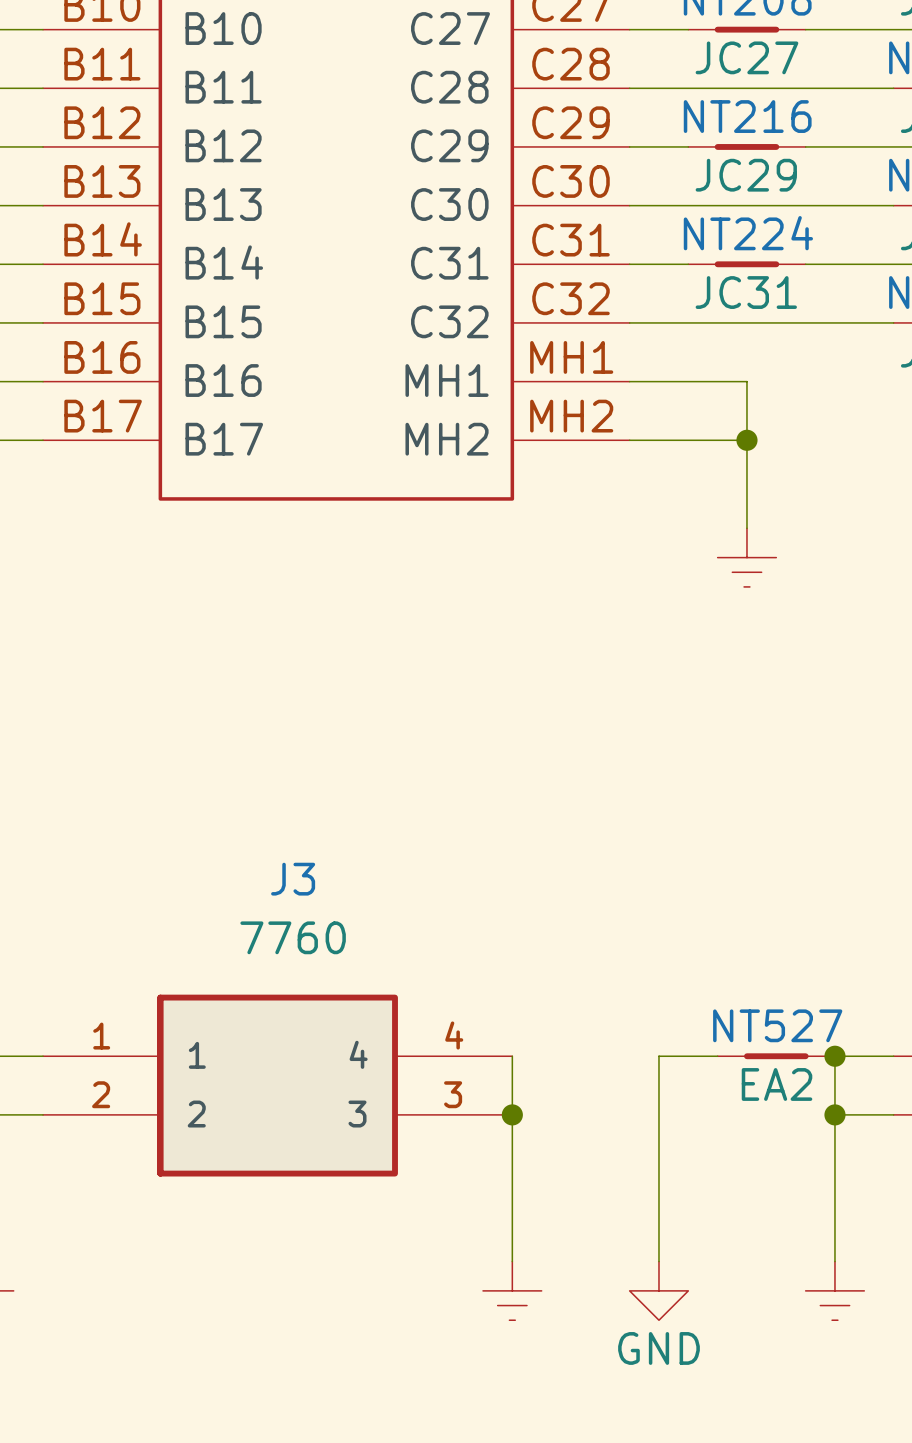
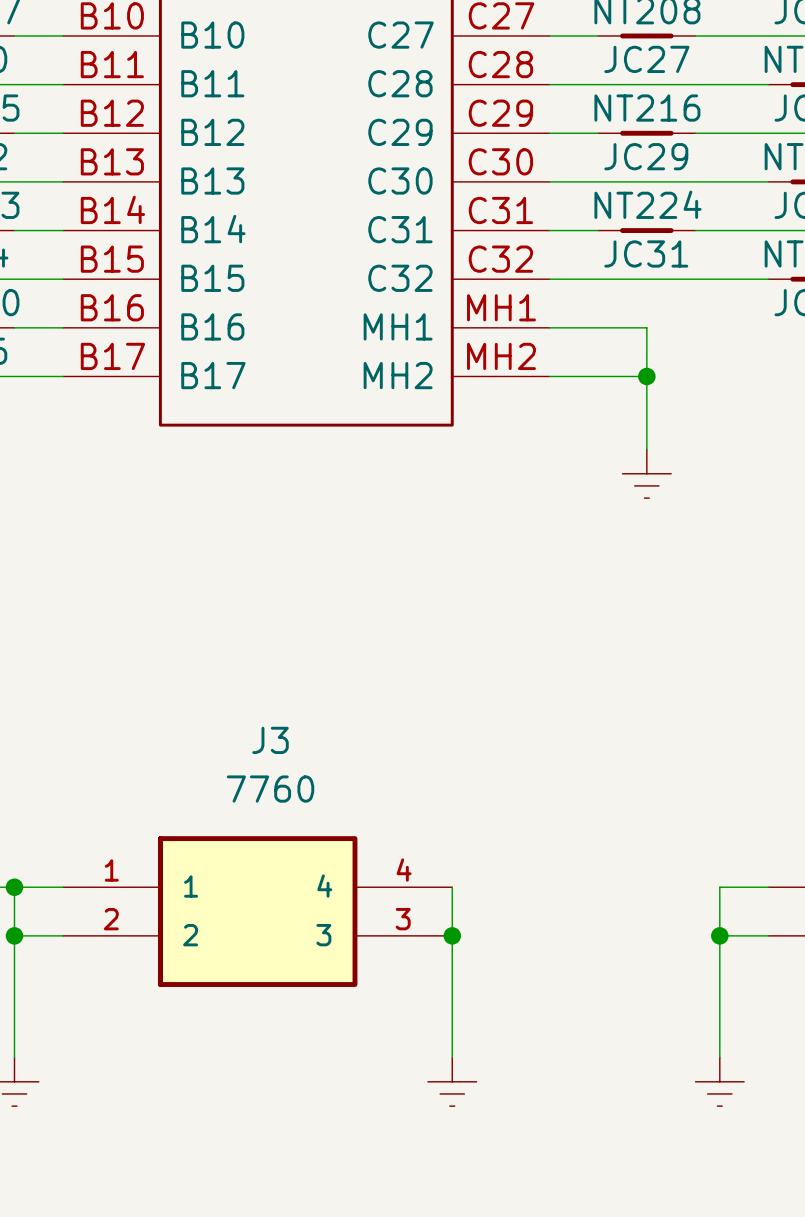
wire: (717, 1056) (658, 1056) (658, 1261) -> none
NT527: EA2 (776, 1056) -> none
junction: (834, 1056) -> none
power symbol: GND (658, 1290) -> none

